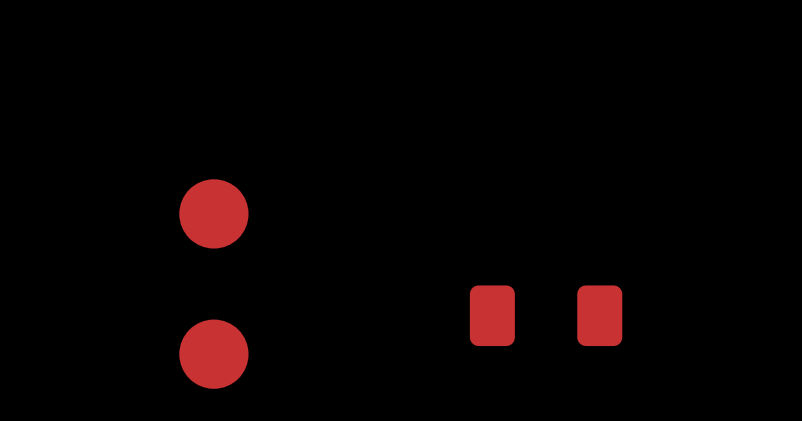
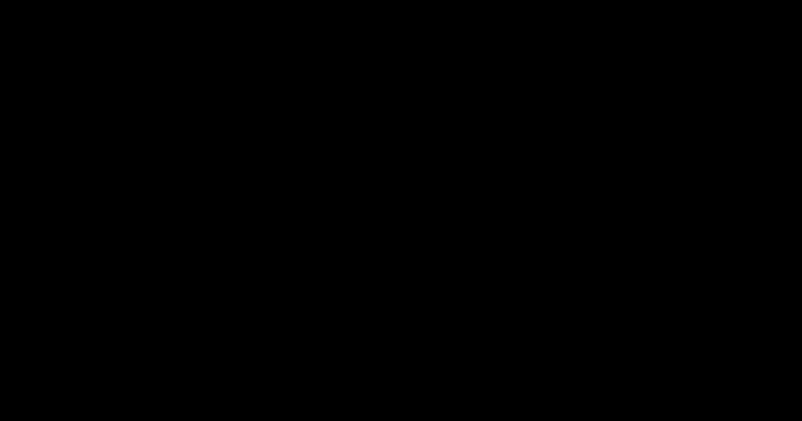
part: (213, 213) -> none
part: (546, 315) -> none
part: (213, 354) -> none

